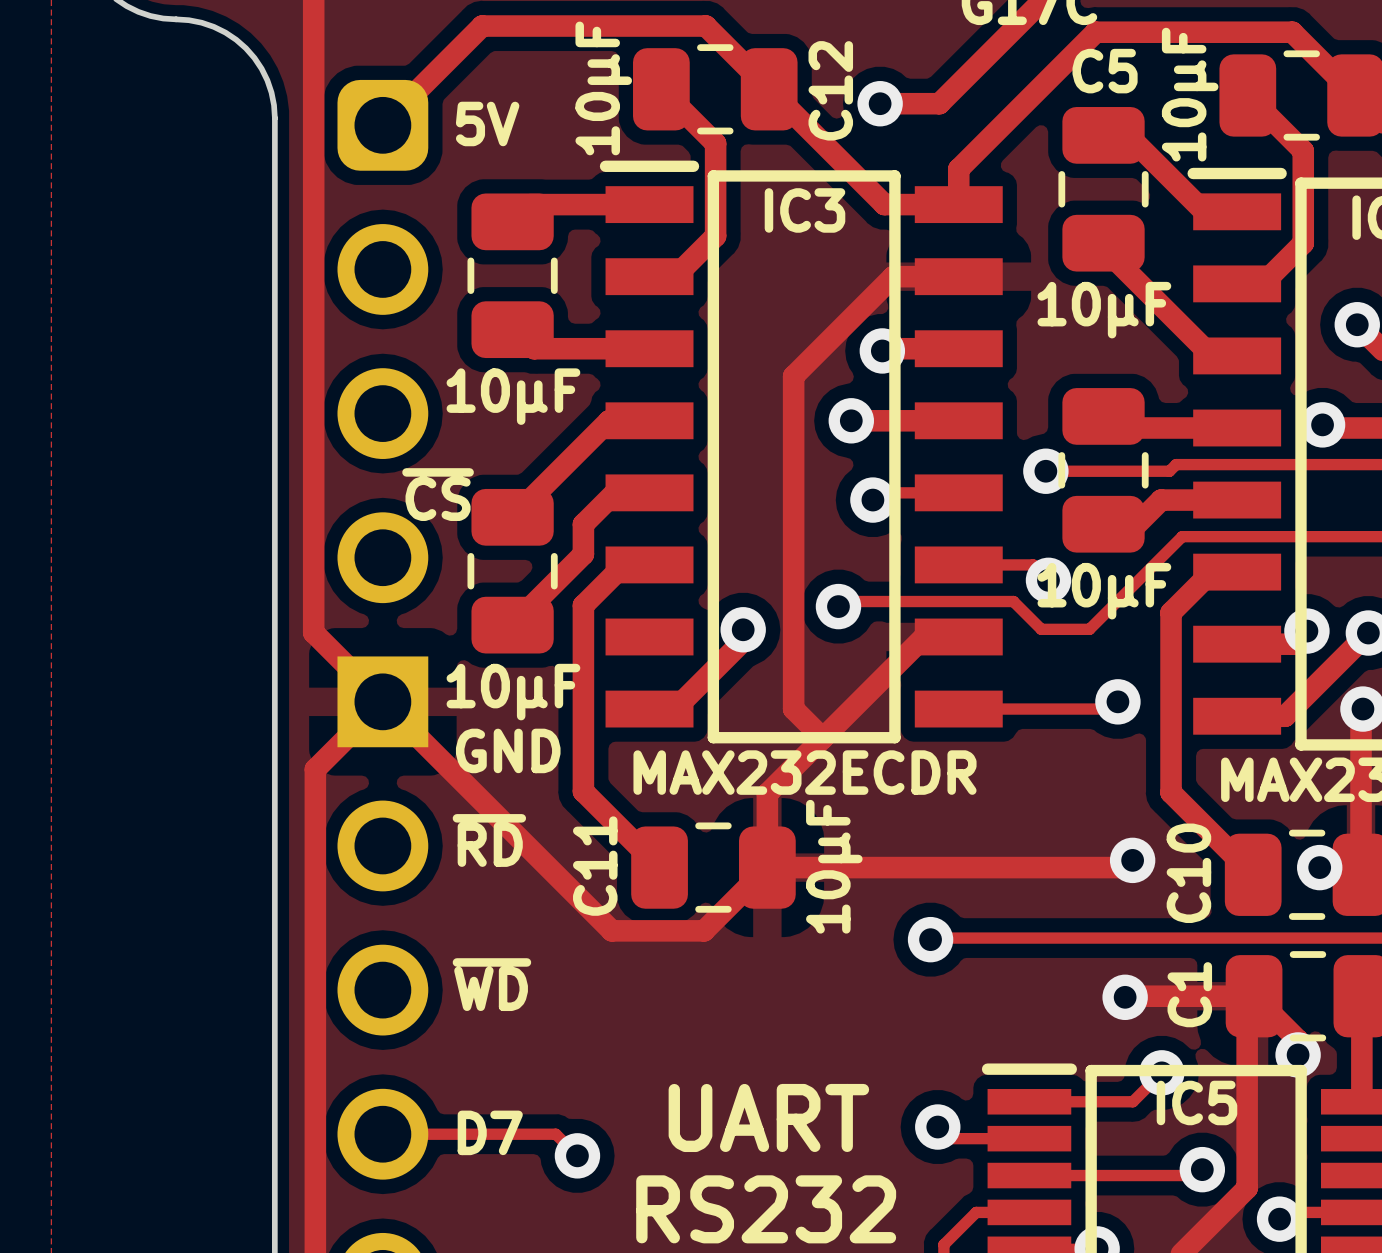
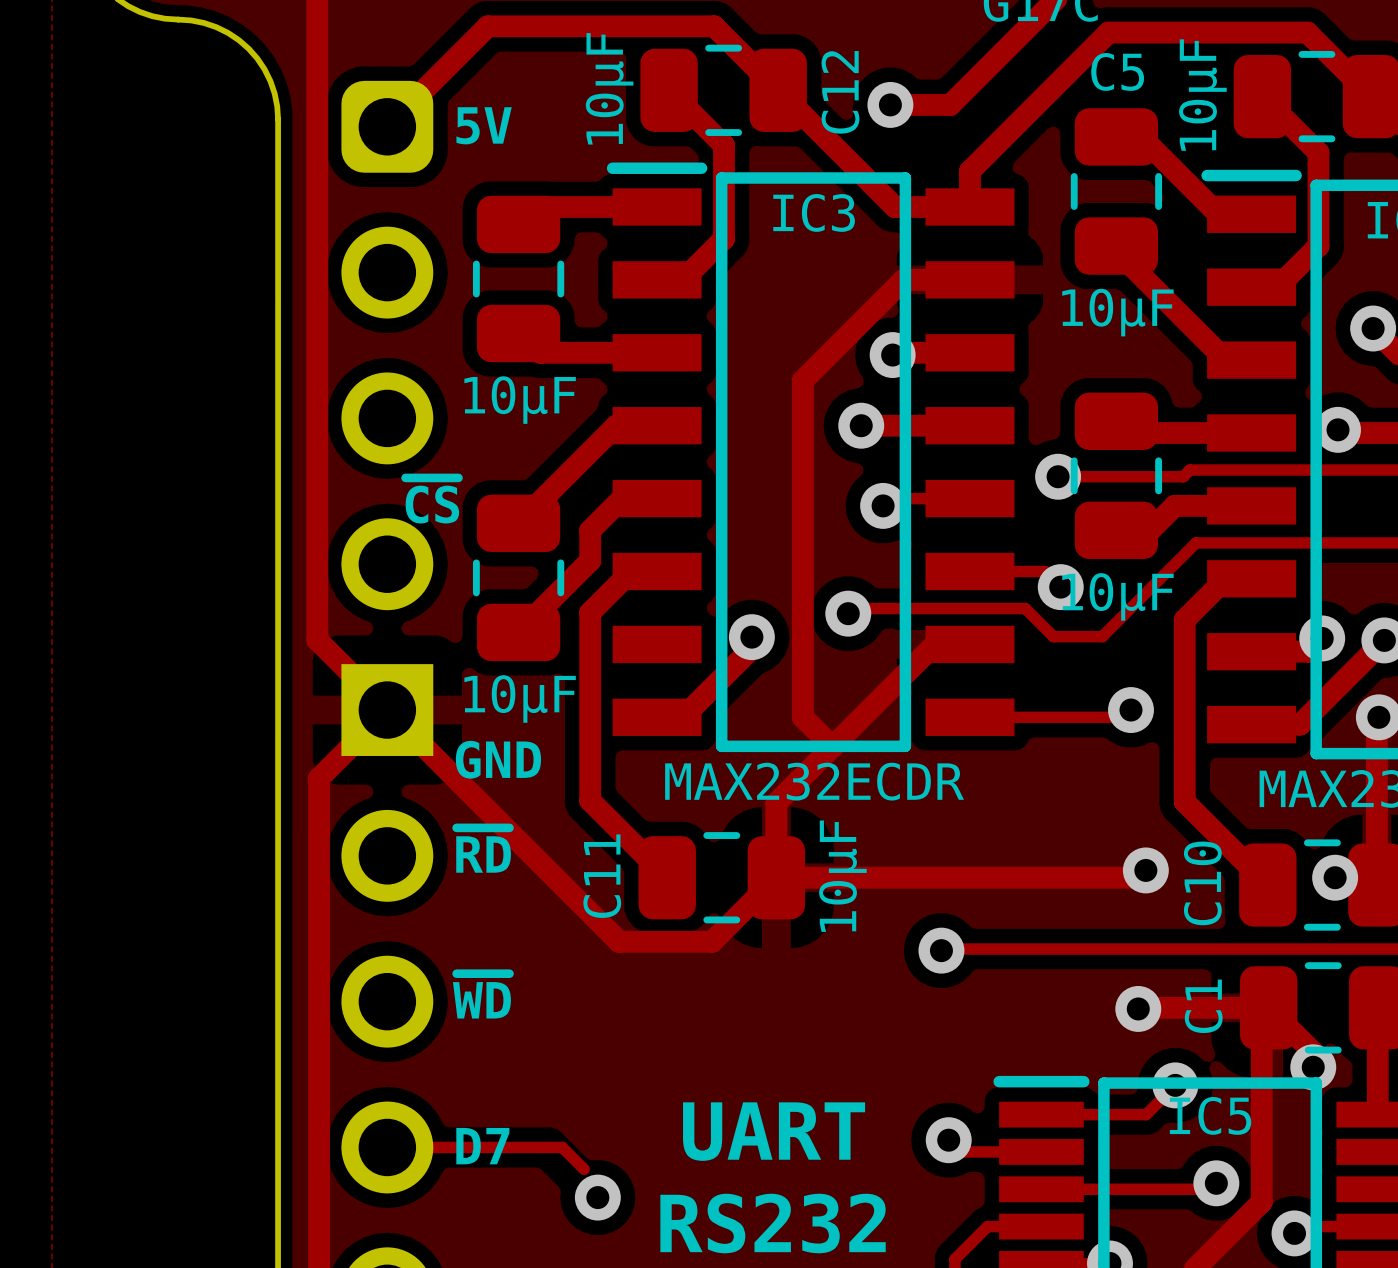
via position: (577, 1155) -> (597, 1197)

